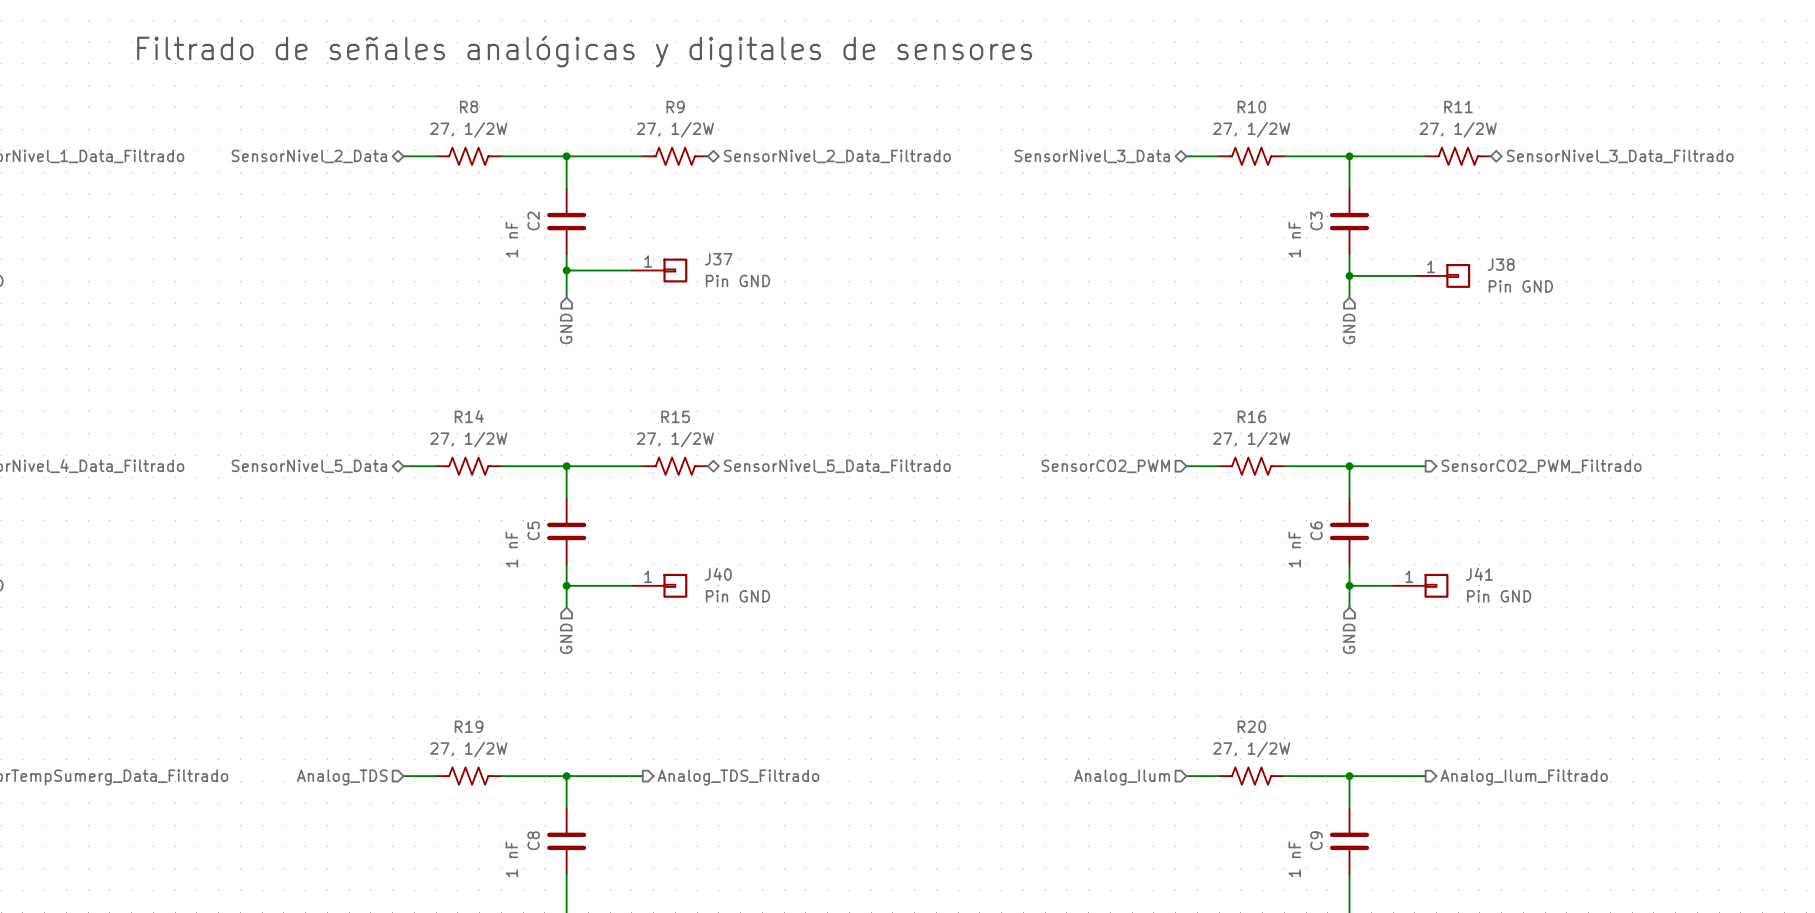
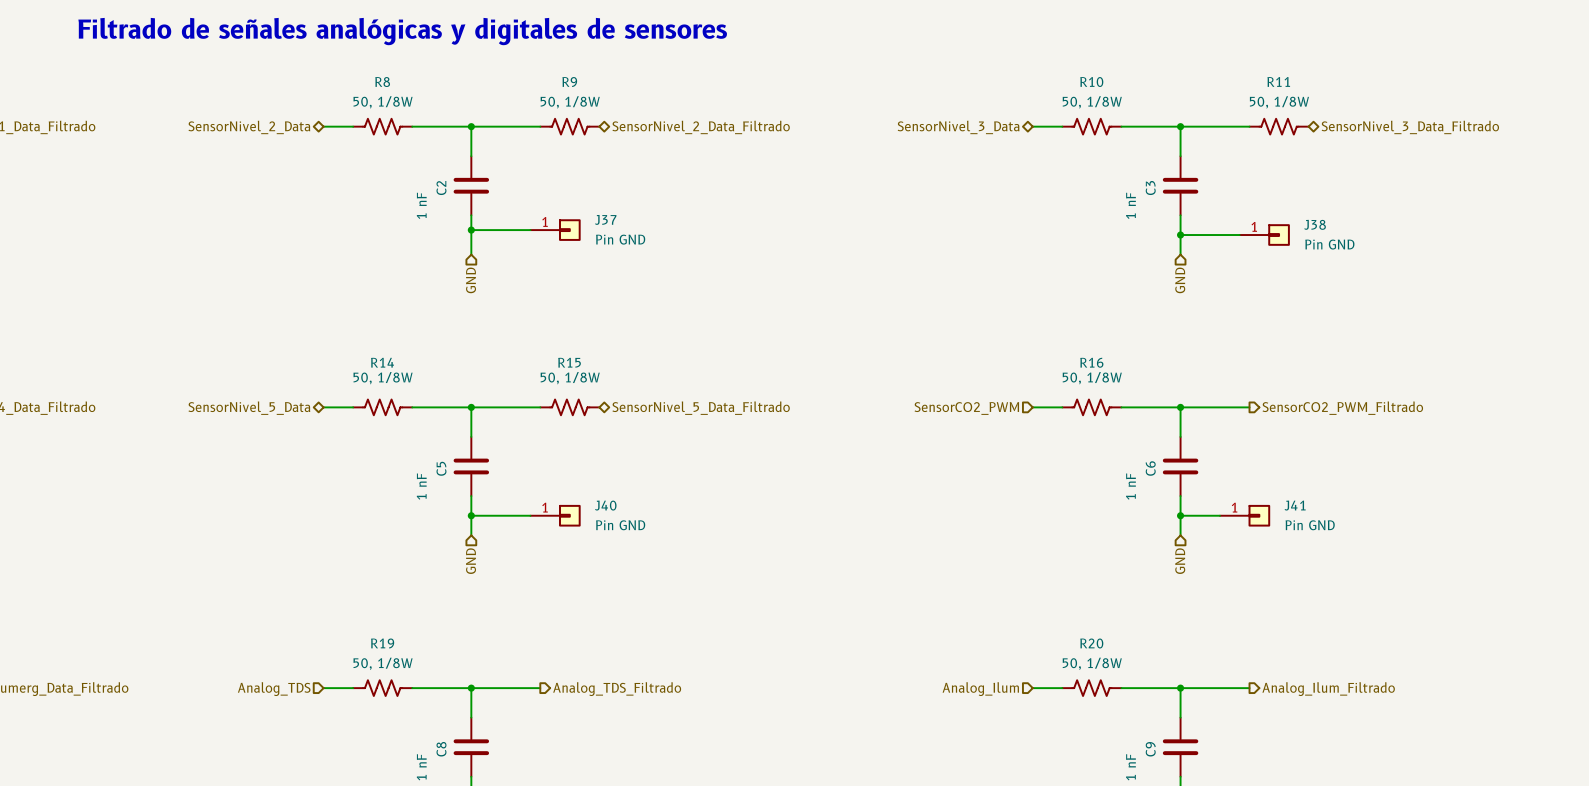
R8 value: 27, 1/2W (468, 129) -> 50, 1/8W (383, 102)
R9 value: 27, 1/2W (675, 129) -> 50, 1/8W (570, 102)
R10 value: 27, 1/2W (1251, 129) -> 50, 1/8W (1092, 102)
R11 value: 27, 1/2W (1458, 129) -> 50, 1/8W (1279, 102)
R14 value: 27, 1/2W (468, 439) -> 50, 1/8W (383, 378)
R15 value: 27, 1/2W (675, 439) -> 50, 1/8W (570, 378)
R16 value: 27, 1/2W (1251, 439) -> 50, 1/8W (1092, 378)
R19 value: 27, 1/2W (468, 749) -> 50, 1/8W (383, 663)
R20 value: 27, 1/2W (1251, 749) -> 50, 1/8W (1092, 663)

